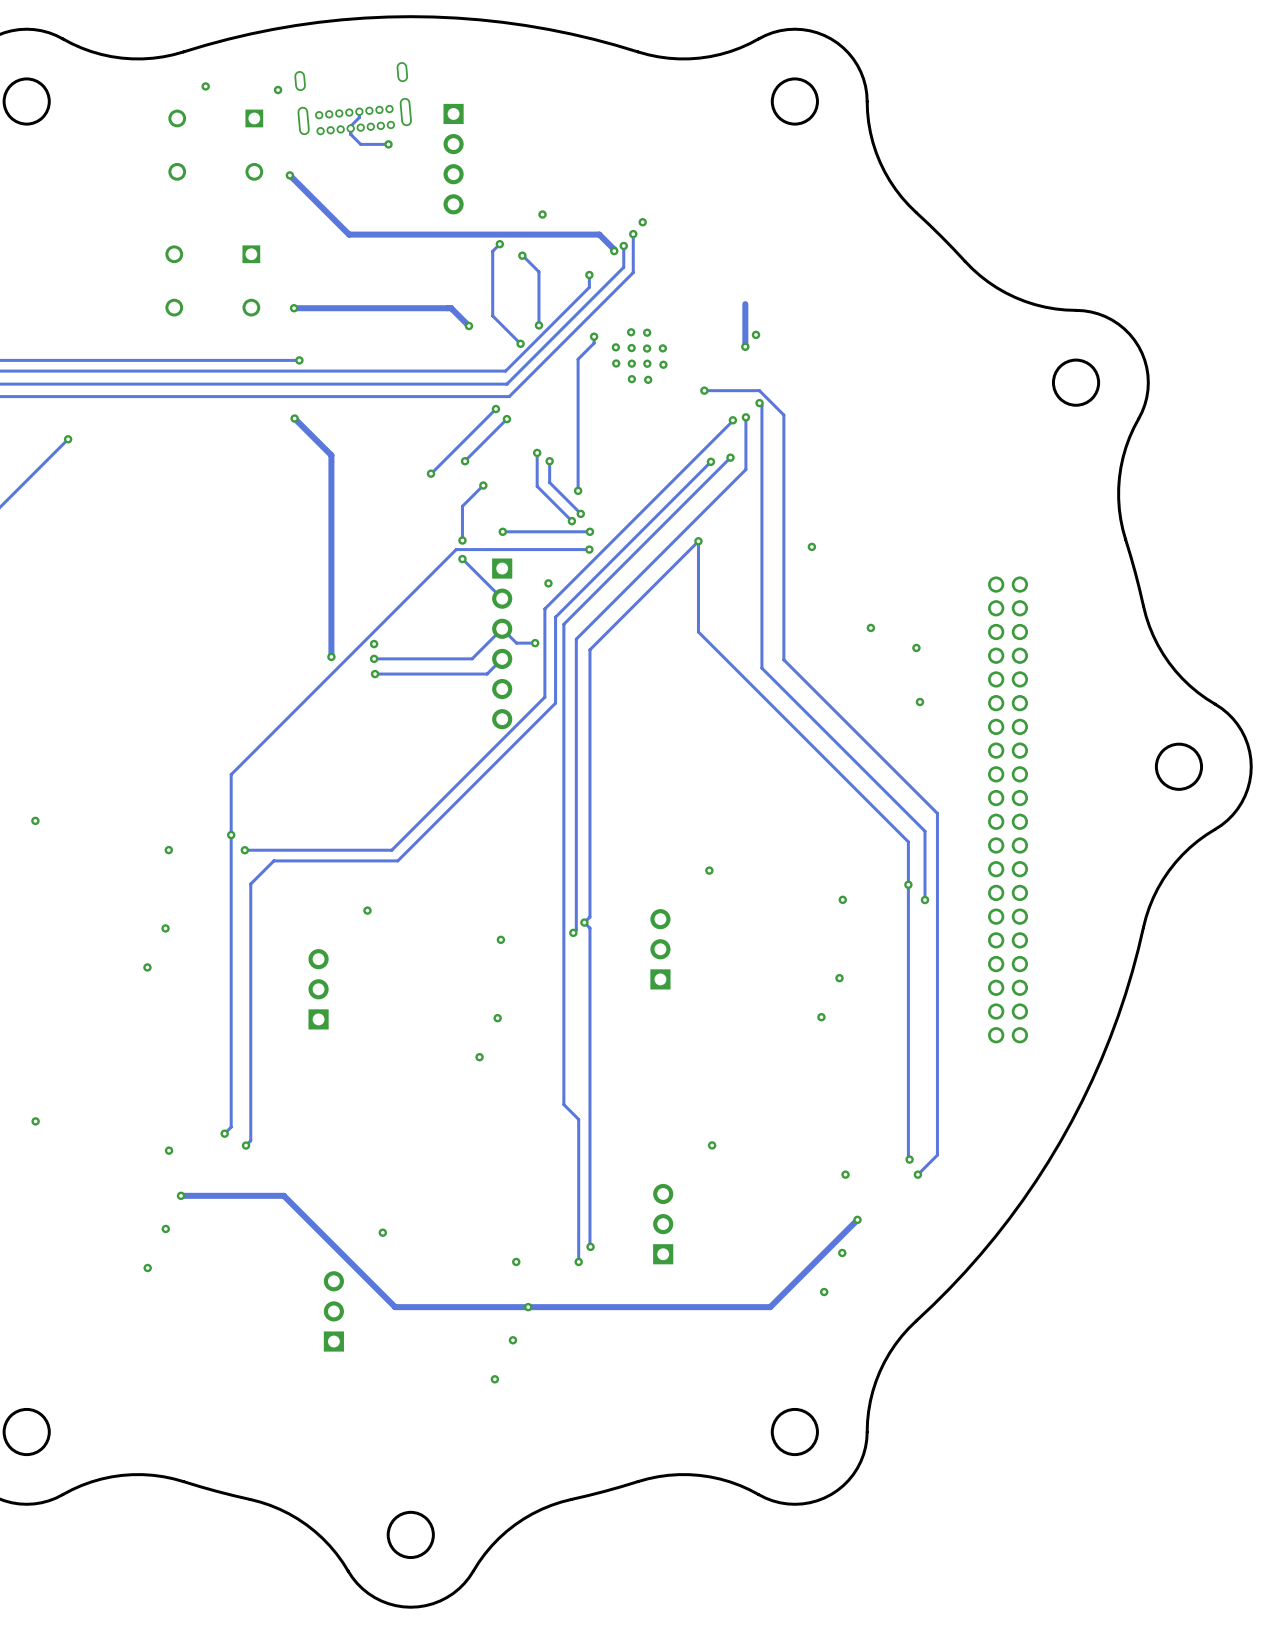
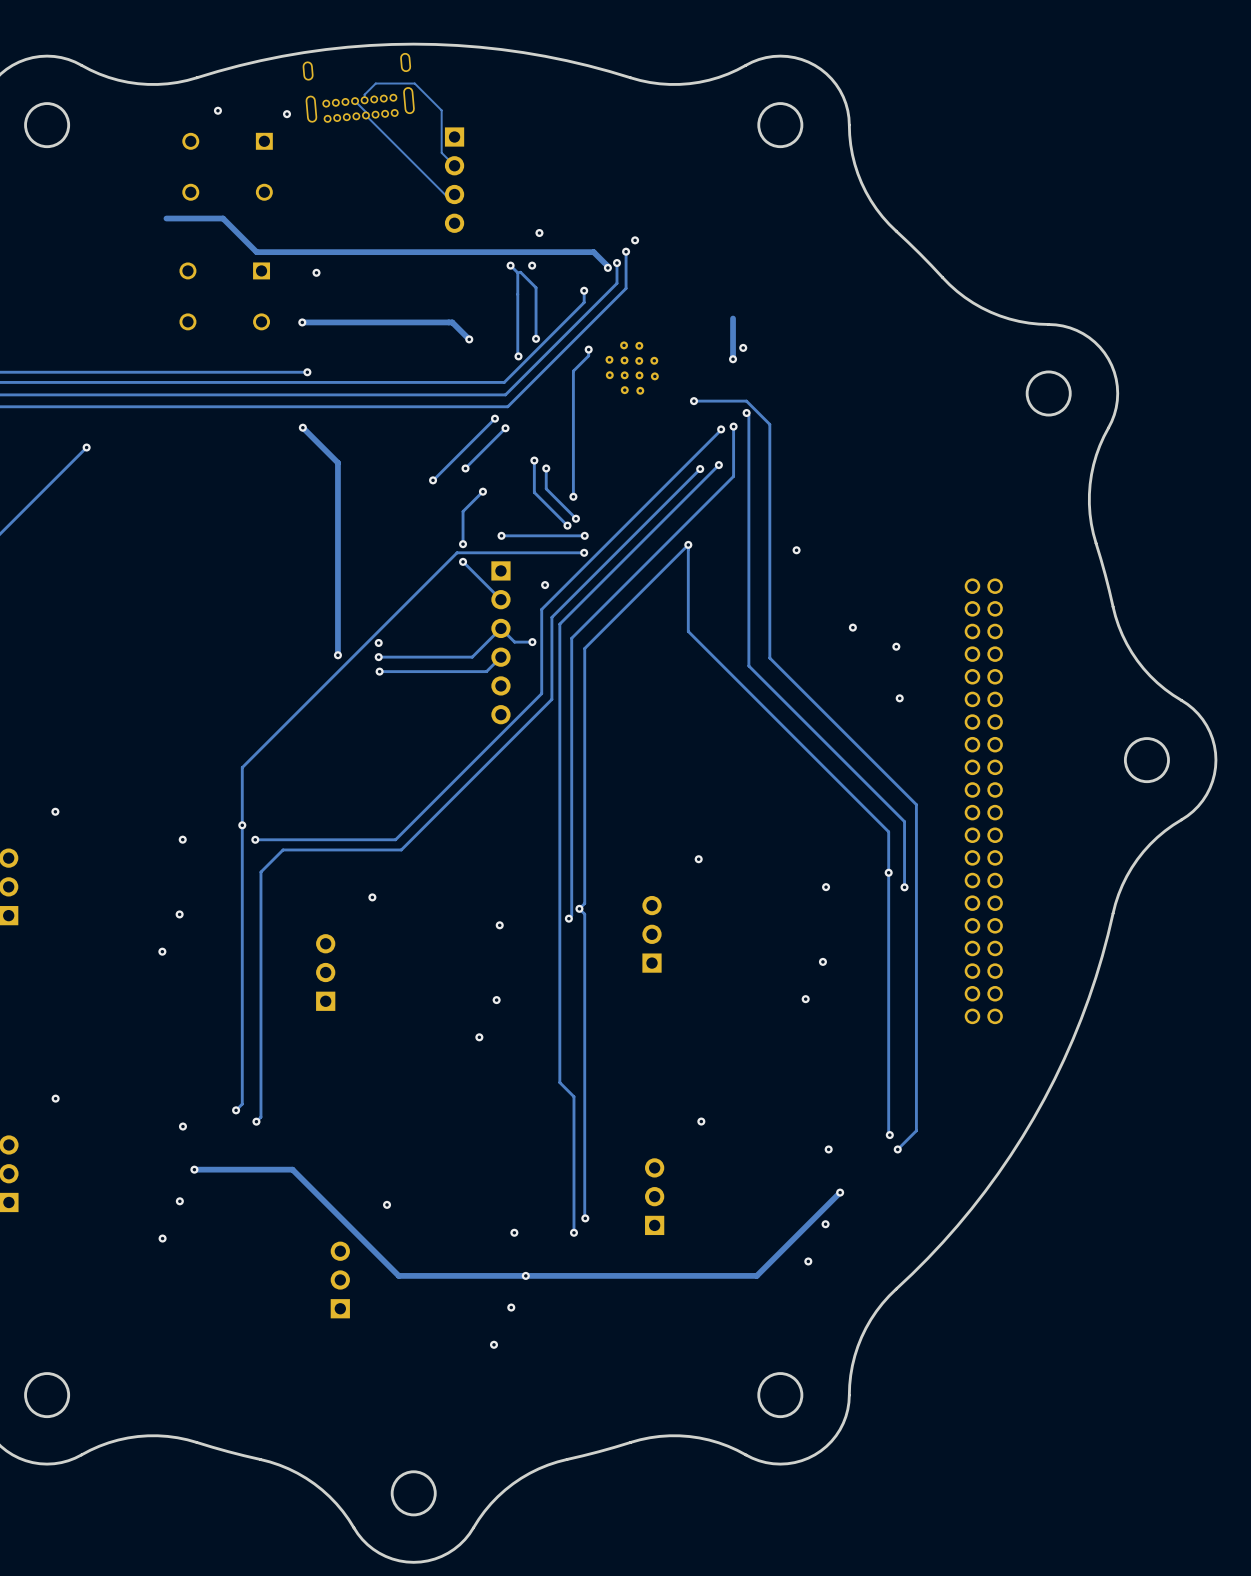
track: none -> (364, 100) (364, 94) (375, 83) (414, 83) (441, 110) (441, 152) (454, 165)
track: none -> (355, 101) (365, 112) (365, 115) (444, 194) (454, 194)
part position: (353, 98) -> (358, 87)
track: (359, 111) (359, 117) (350, 126) (350, 134) (360, 144) (388, 144) -> none
via: (388, 144) -> none
track: (289, 175) (349, 234) -> (166, 218) (223, 218) (256, 252) (354, 252)
via: (289, 175) -> none
track: (499, 244) (492, 251) (492, 315) (519, 343) -> (510, 265) (517, 272) (517, 355)
via: (499, 244) -> none
via: none -> (510, 265)
via: none -> (532, 265)
via: (522, 255) -> none
via: none -> (316, 272)

